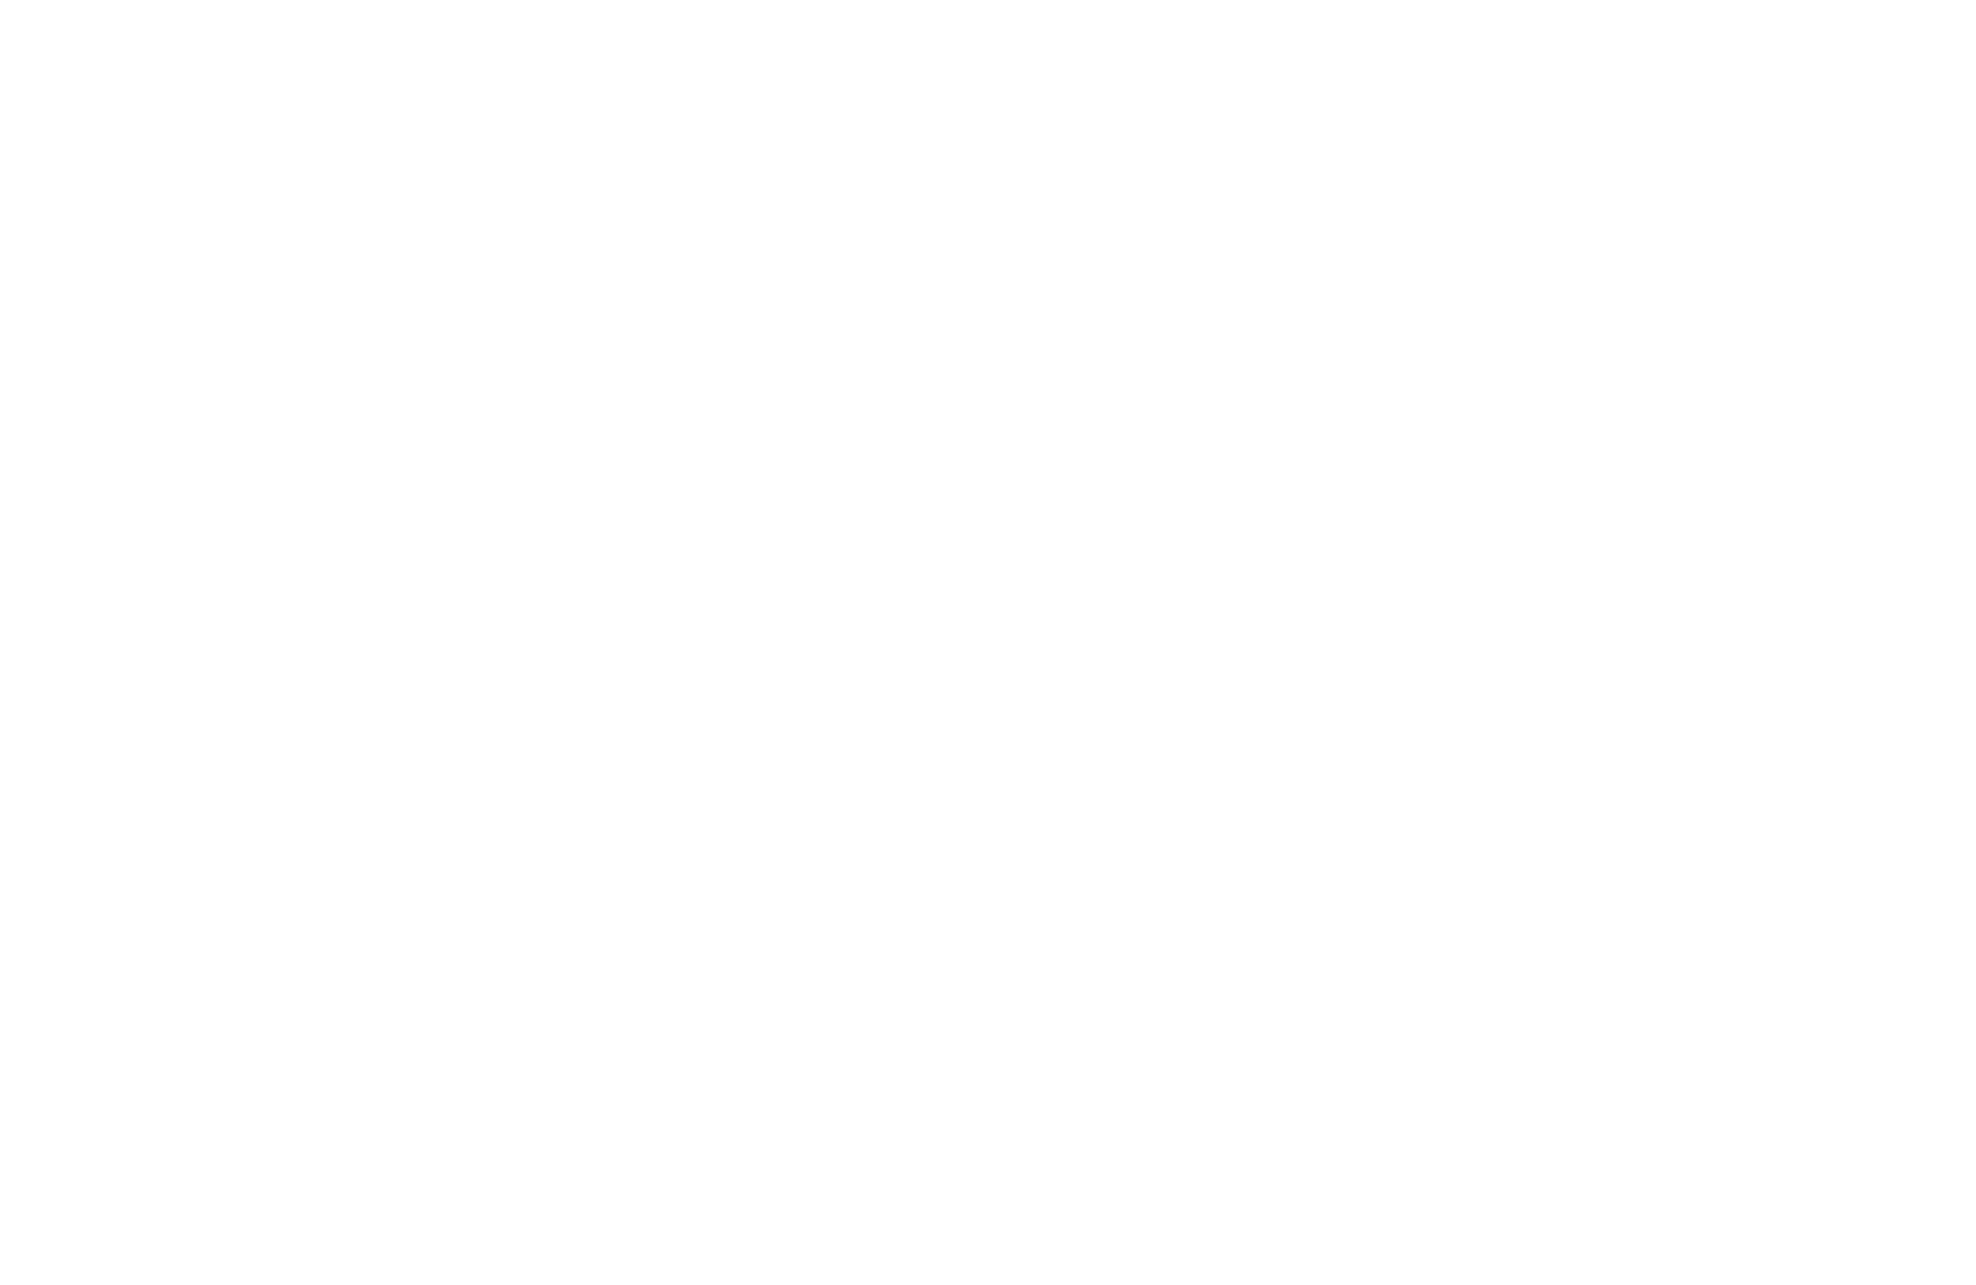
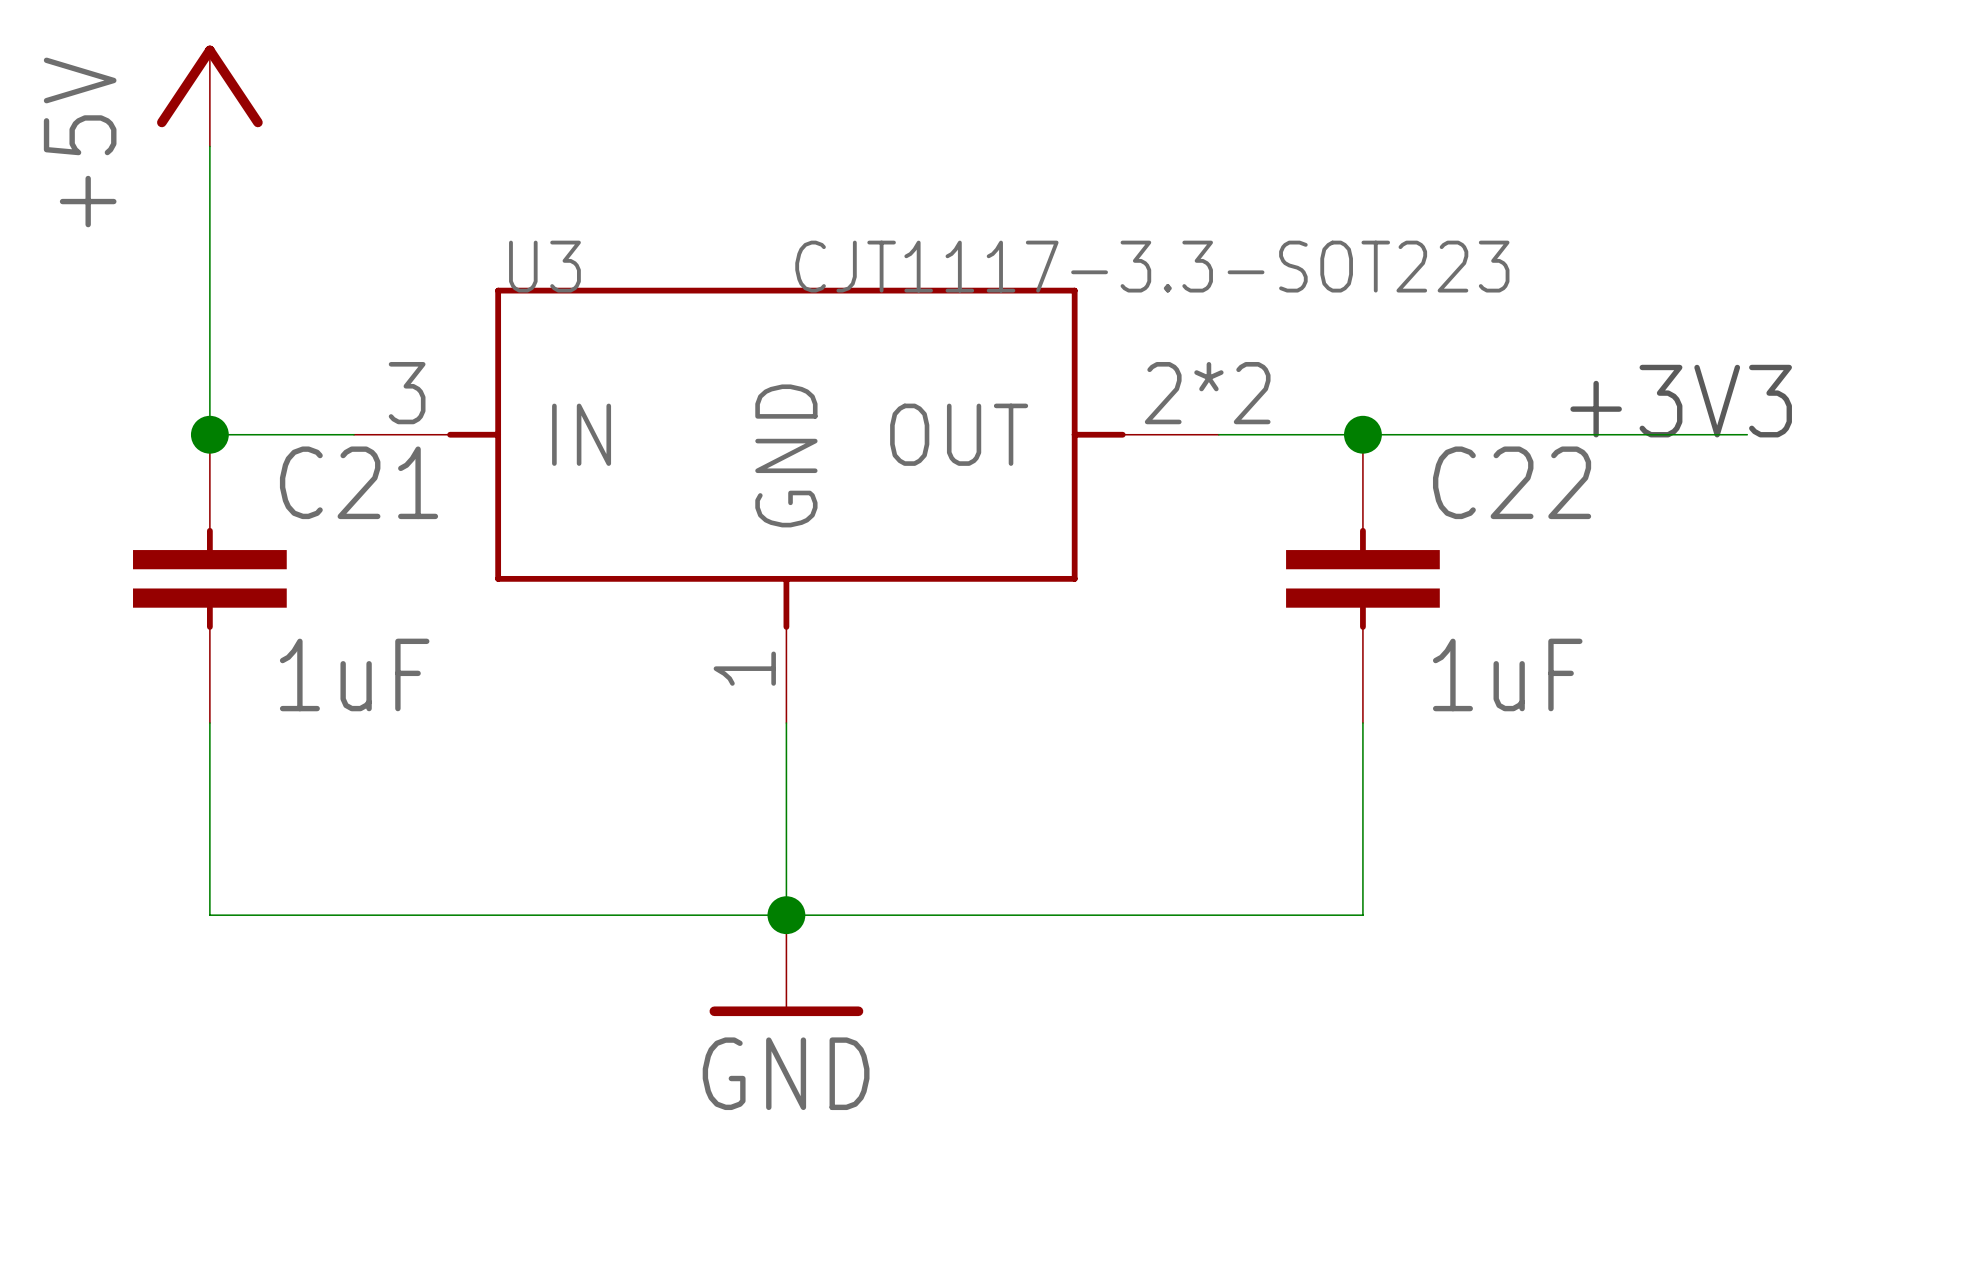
power symbol: none -> +5V (209, 96)
wire: none -> (209, 146) (209, 434) (354, 434)
text: none -> +3V3 (1681, 401)
junction: none -> (209, 434)
wire: none -> (1218, 434) (1747, 434)
junction: none -> (1362, 434)
U3: none -> CJT1117-3.3-SOT223 (786, 505)
C21: none -> 1uF (209, 578)
C22: none -> 1uF (1362, 578)
wire: none -> (209, 723) (209, 915) (1362, 915) (1362, 723)
wire: none -> (786, 723) (786, 915)
junction: none -> (786, 915)
power symbol: none -> GND (786, 965)

